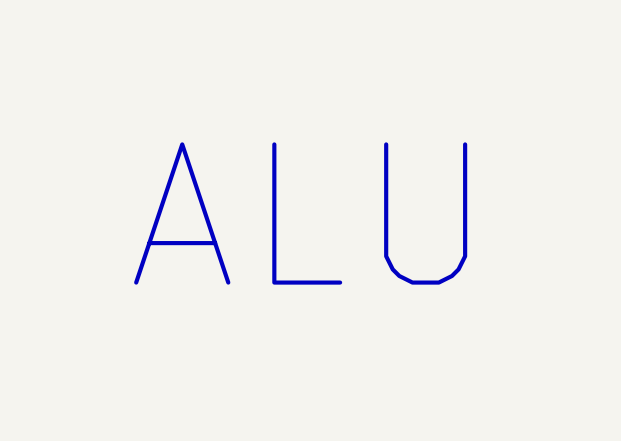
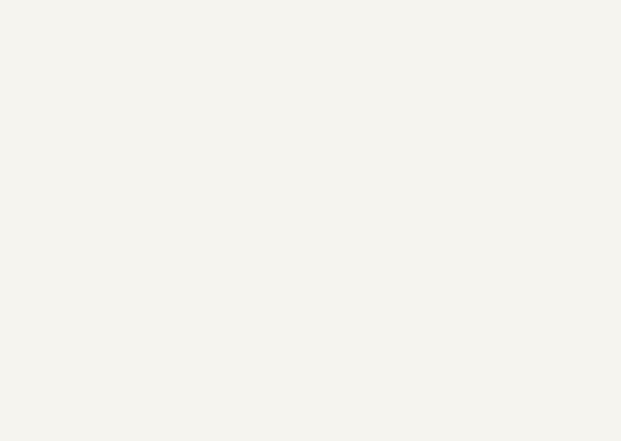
text: ALU (300, 213) -> none

